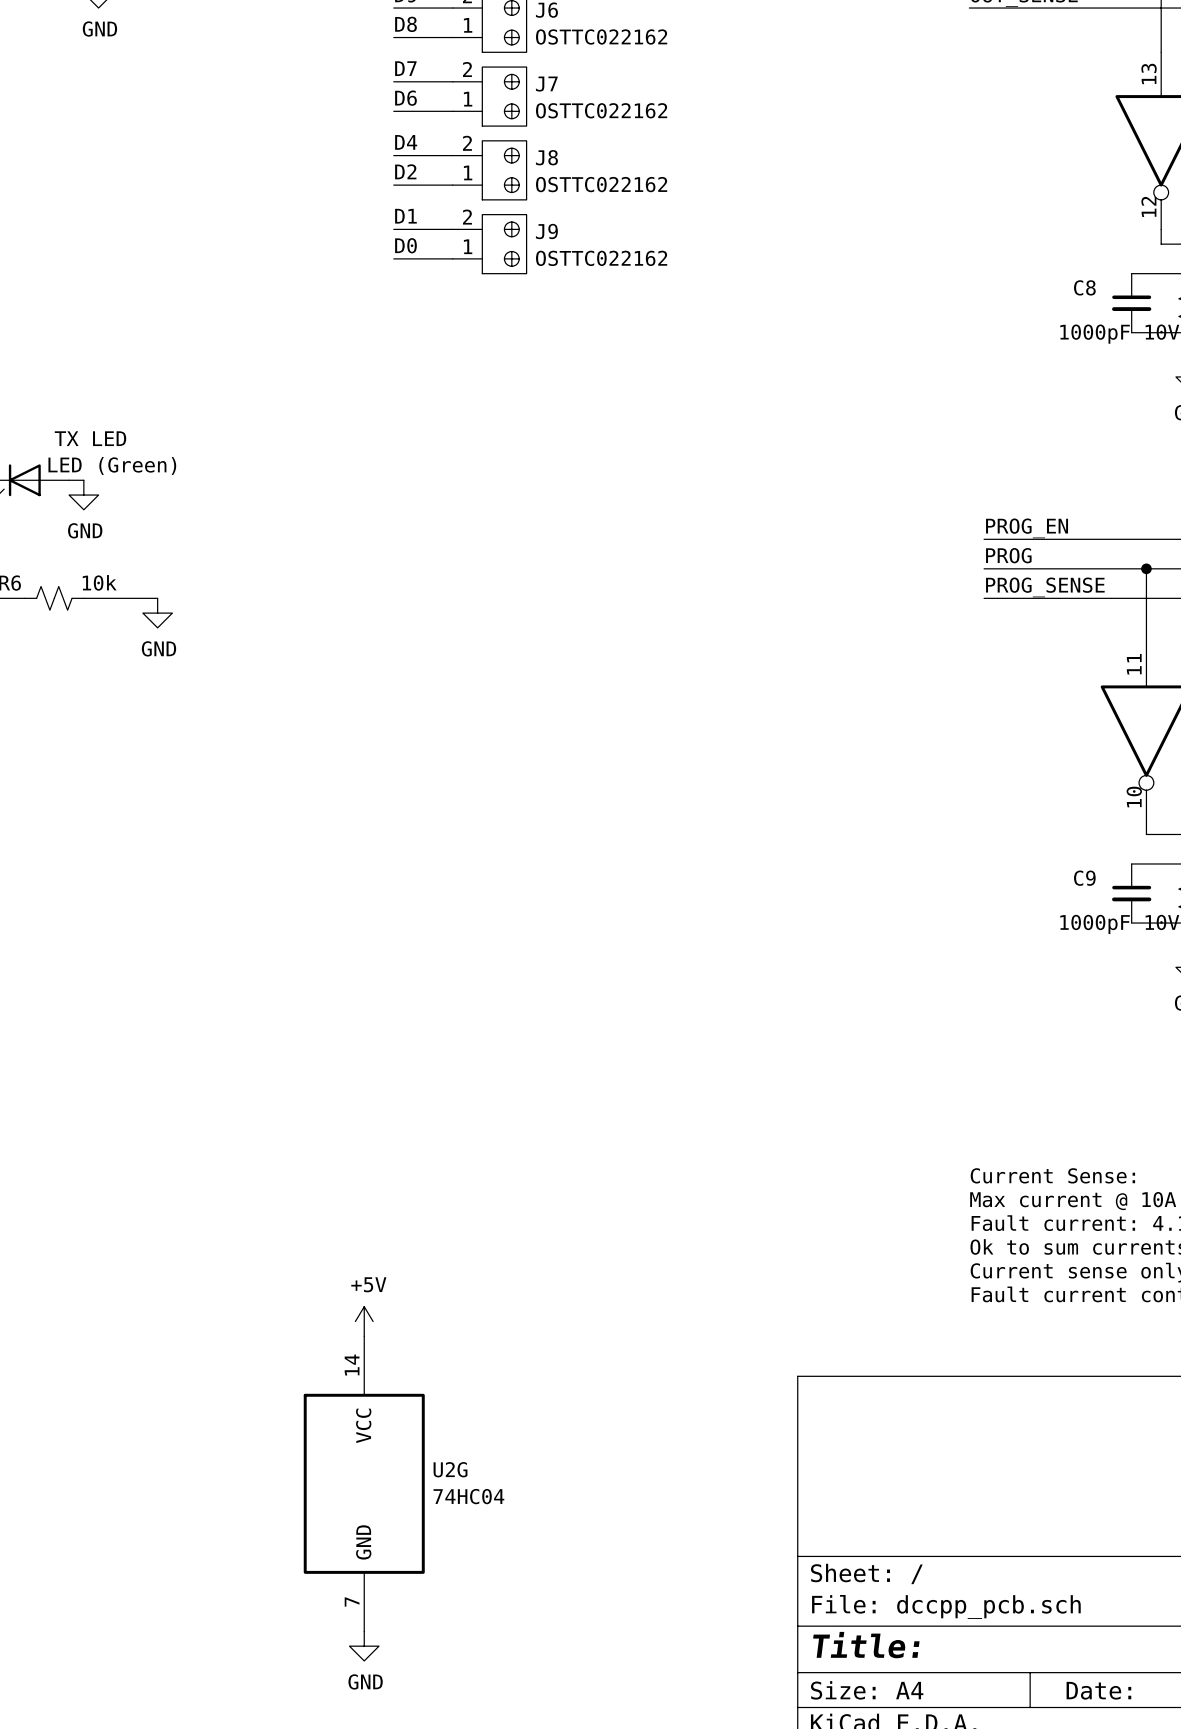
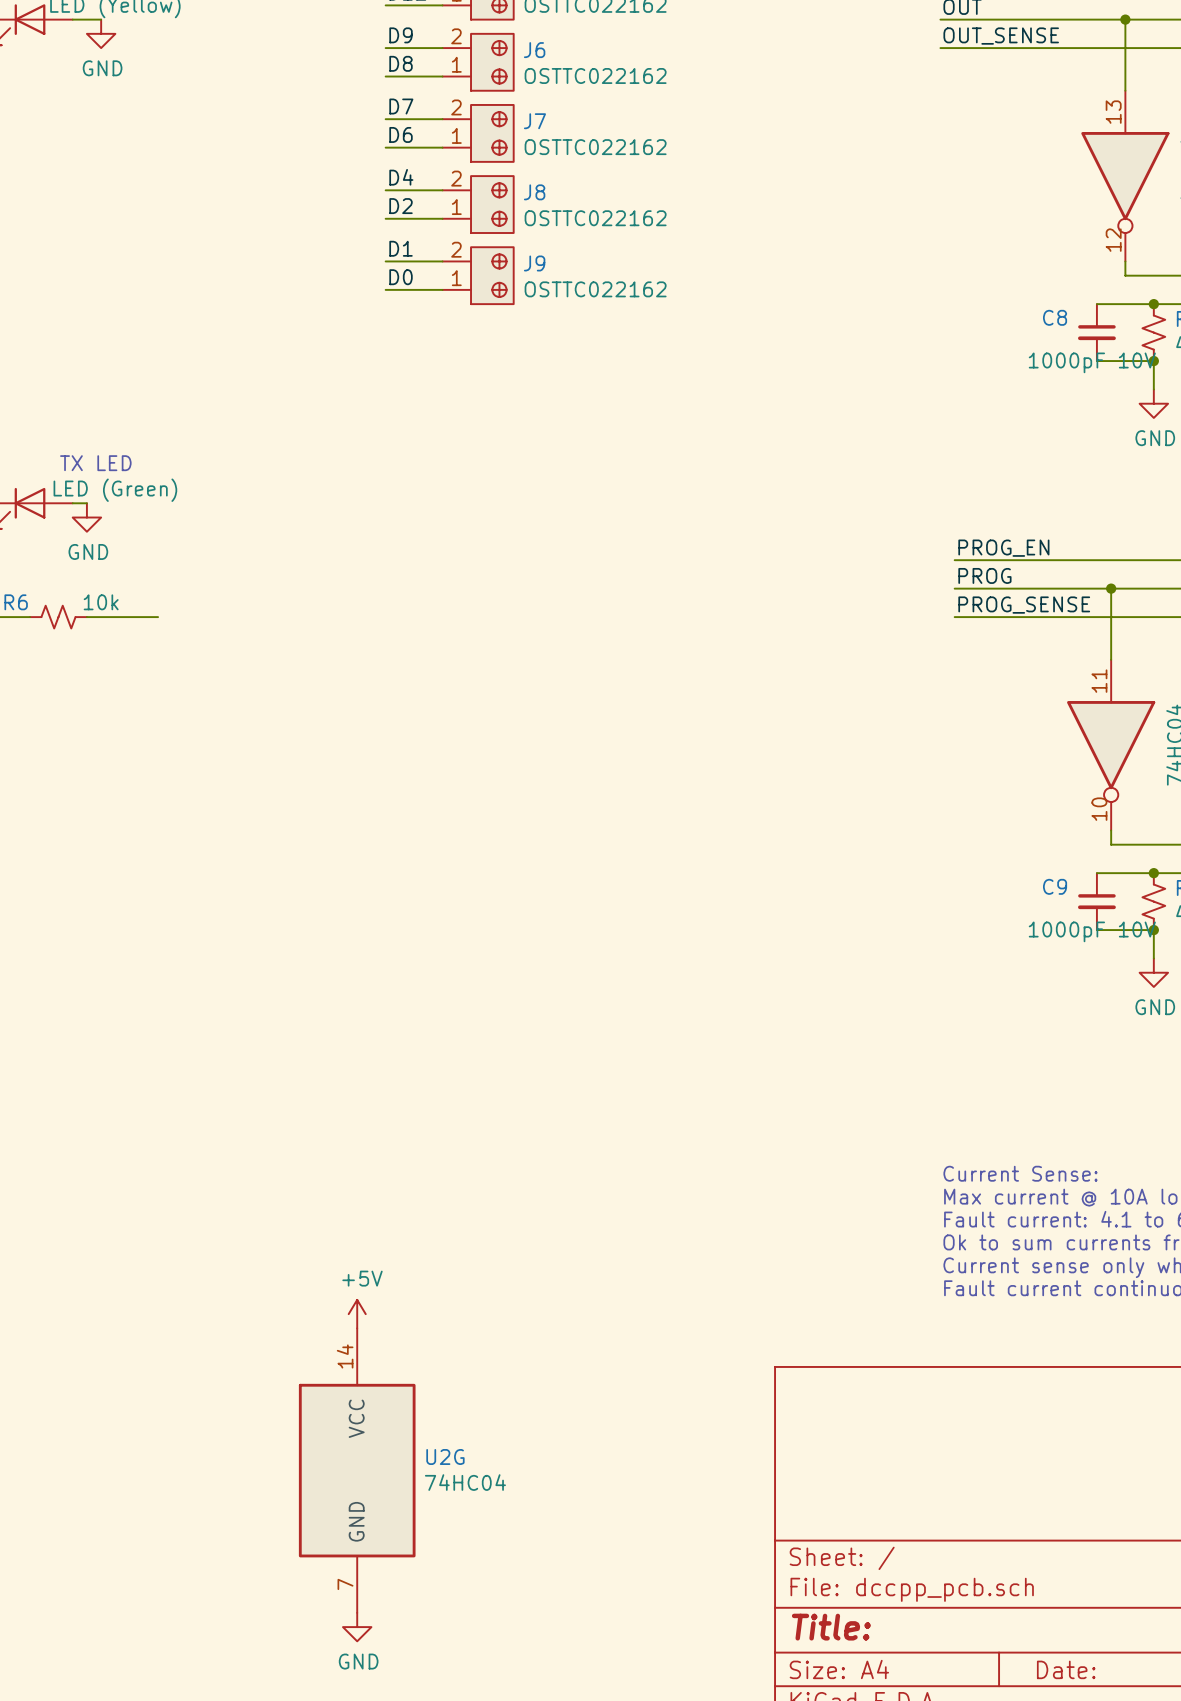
power symbol: GND (157, 613) -> none

